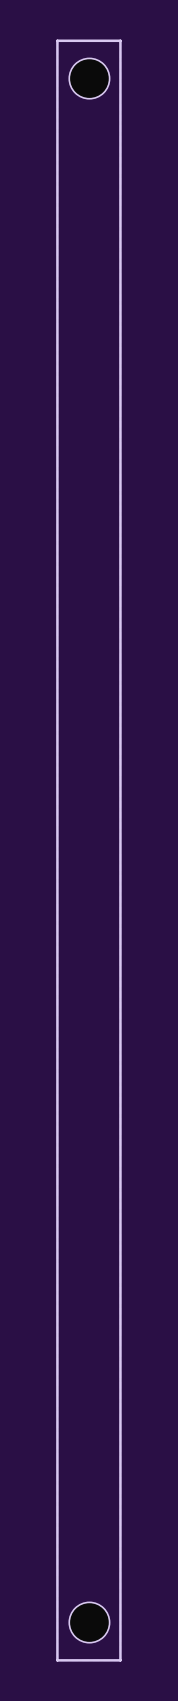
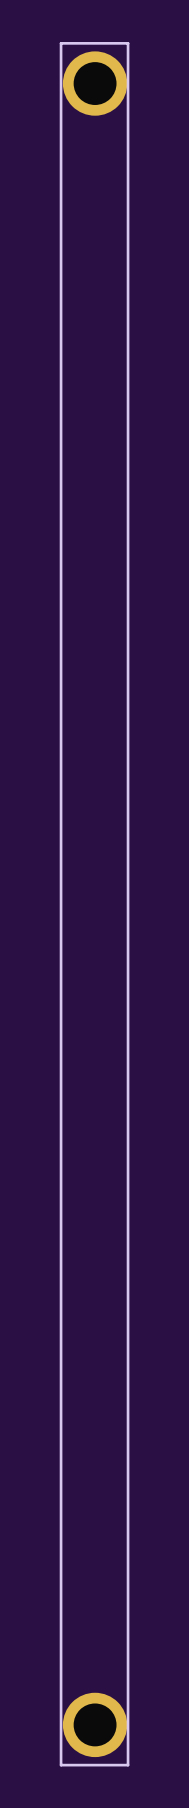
part footprint: [69, 58, 110, 99] -> [62, 51, 128, 116]
part footprint: [69, 1602, 110, 1643] -> [62, 1692, 128, 1758]

